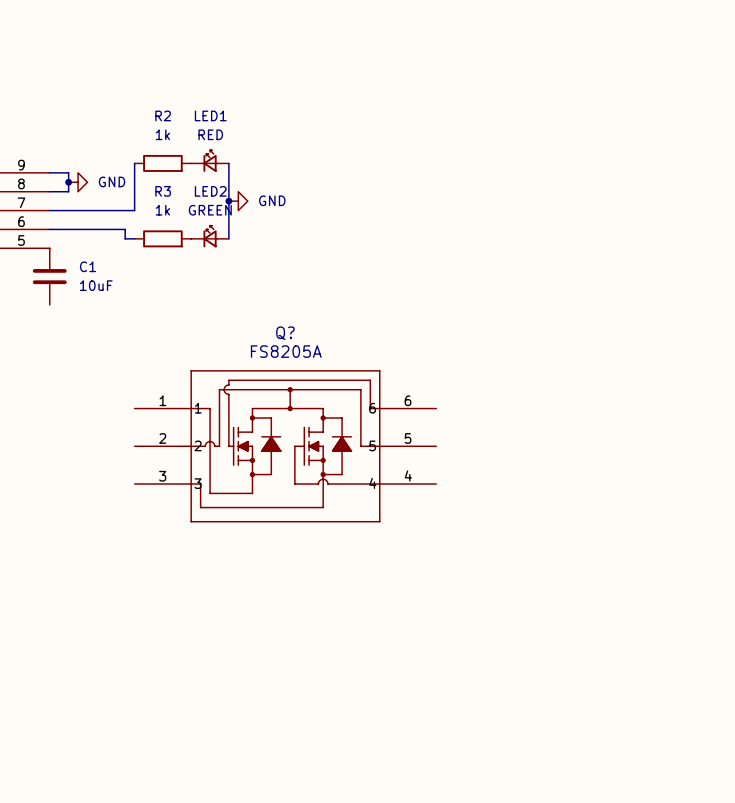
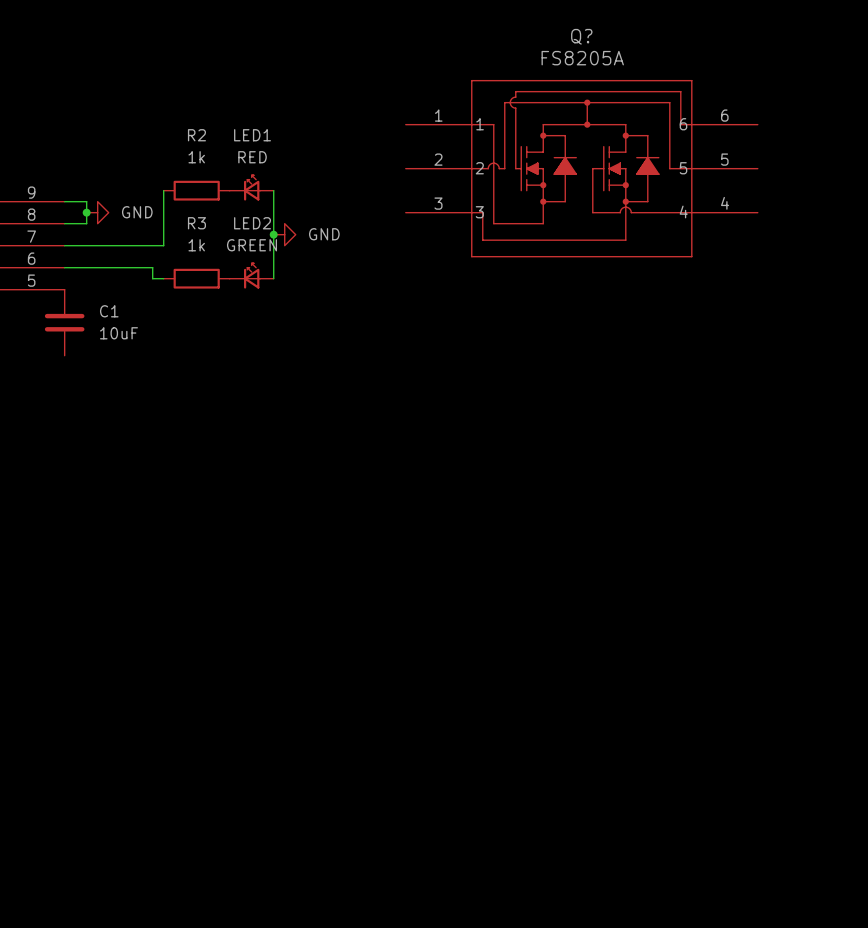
Q?: none -> FS8205A (581, 168)
Q?: FS8205A (285, 446) -> none

